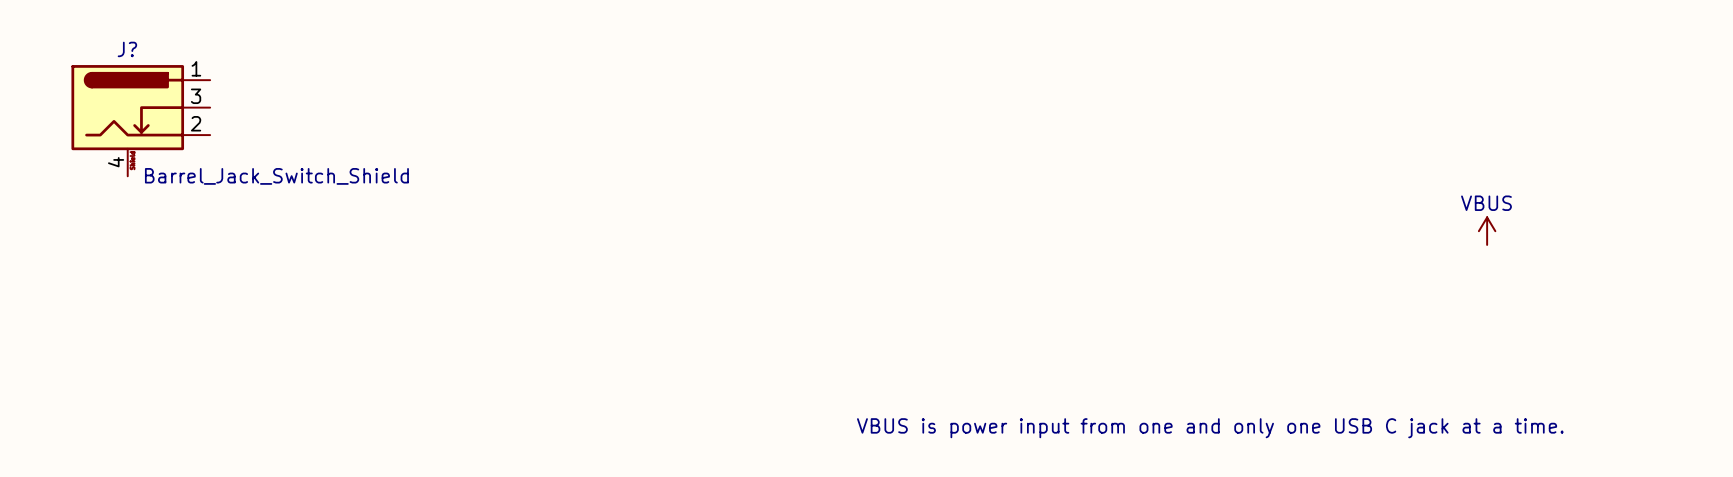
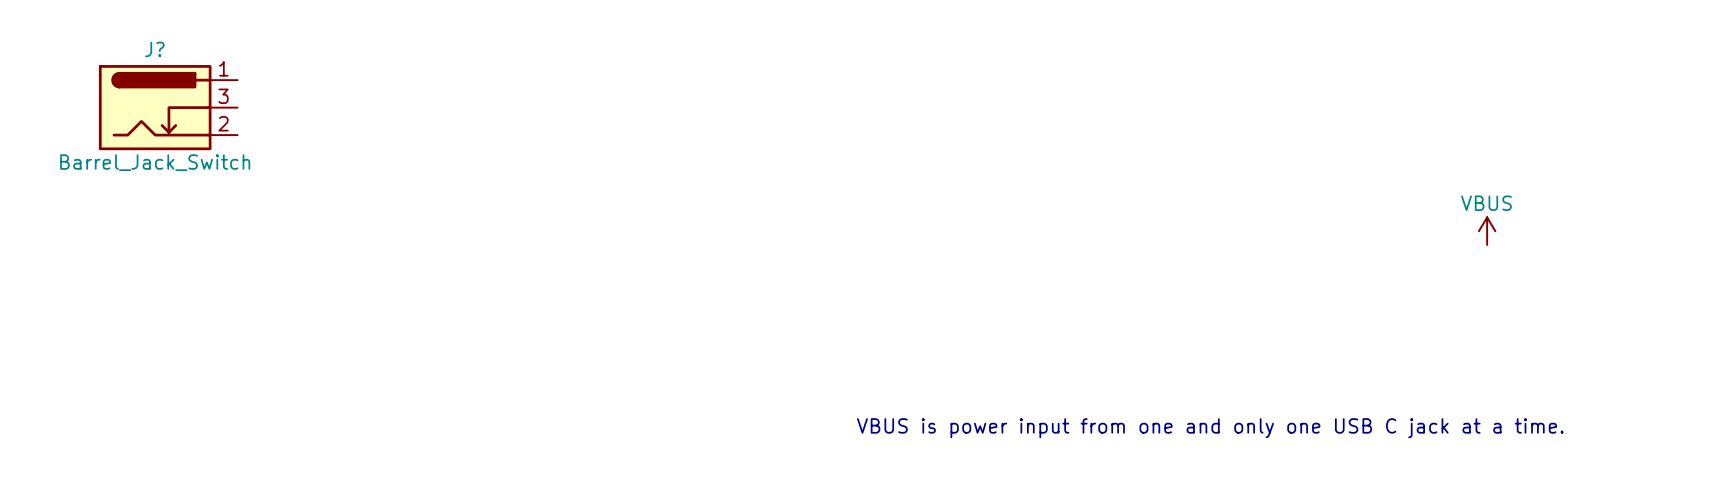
J?: none -> Barrel_Jack_Switch (168, 107)
J?: Barrel_Jack_Switch_Shield (140, 120) -> none

